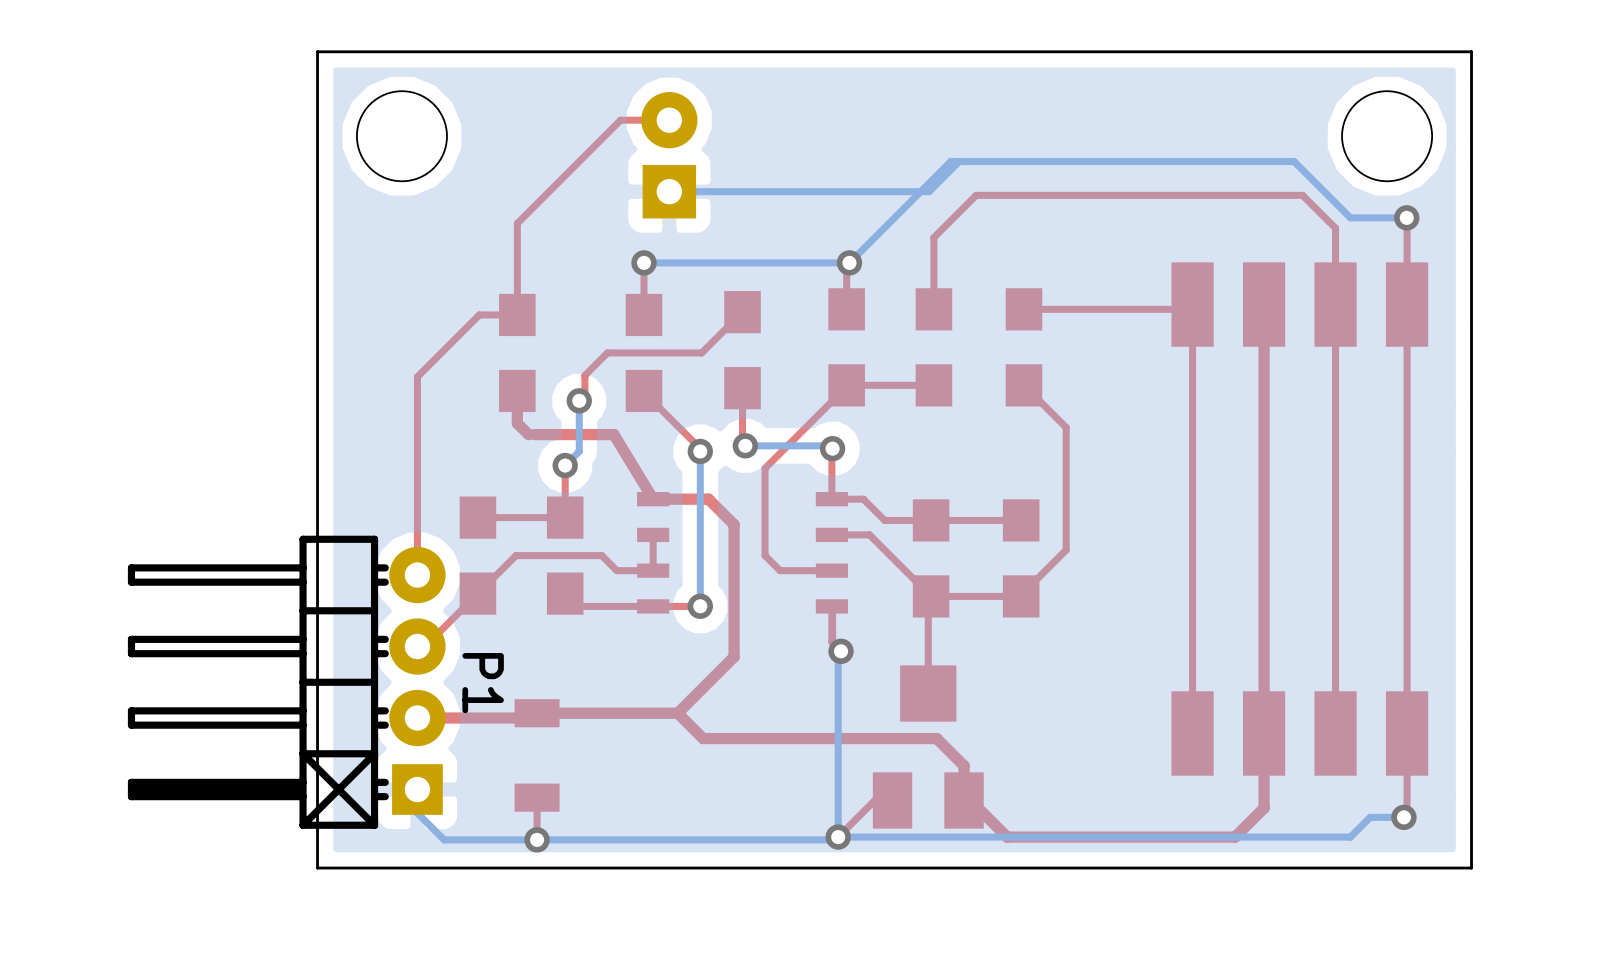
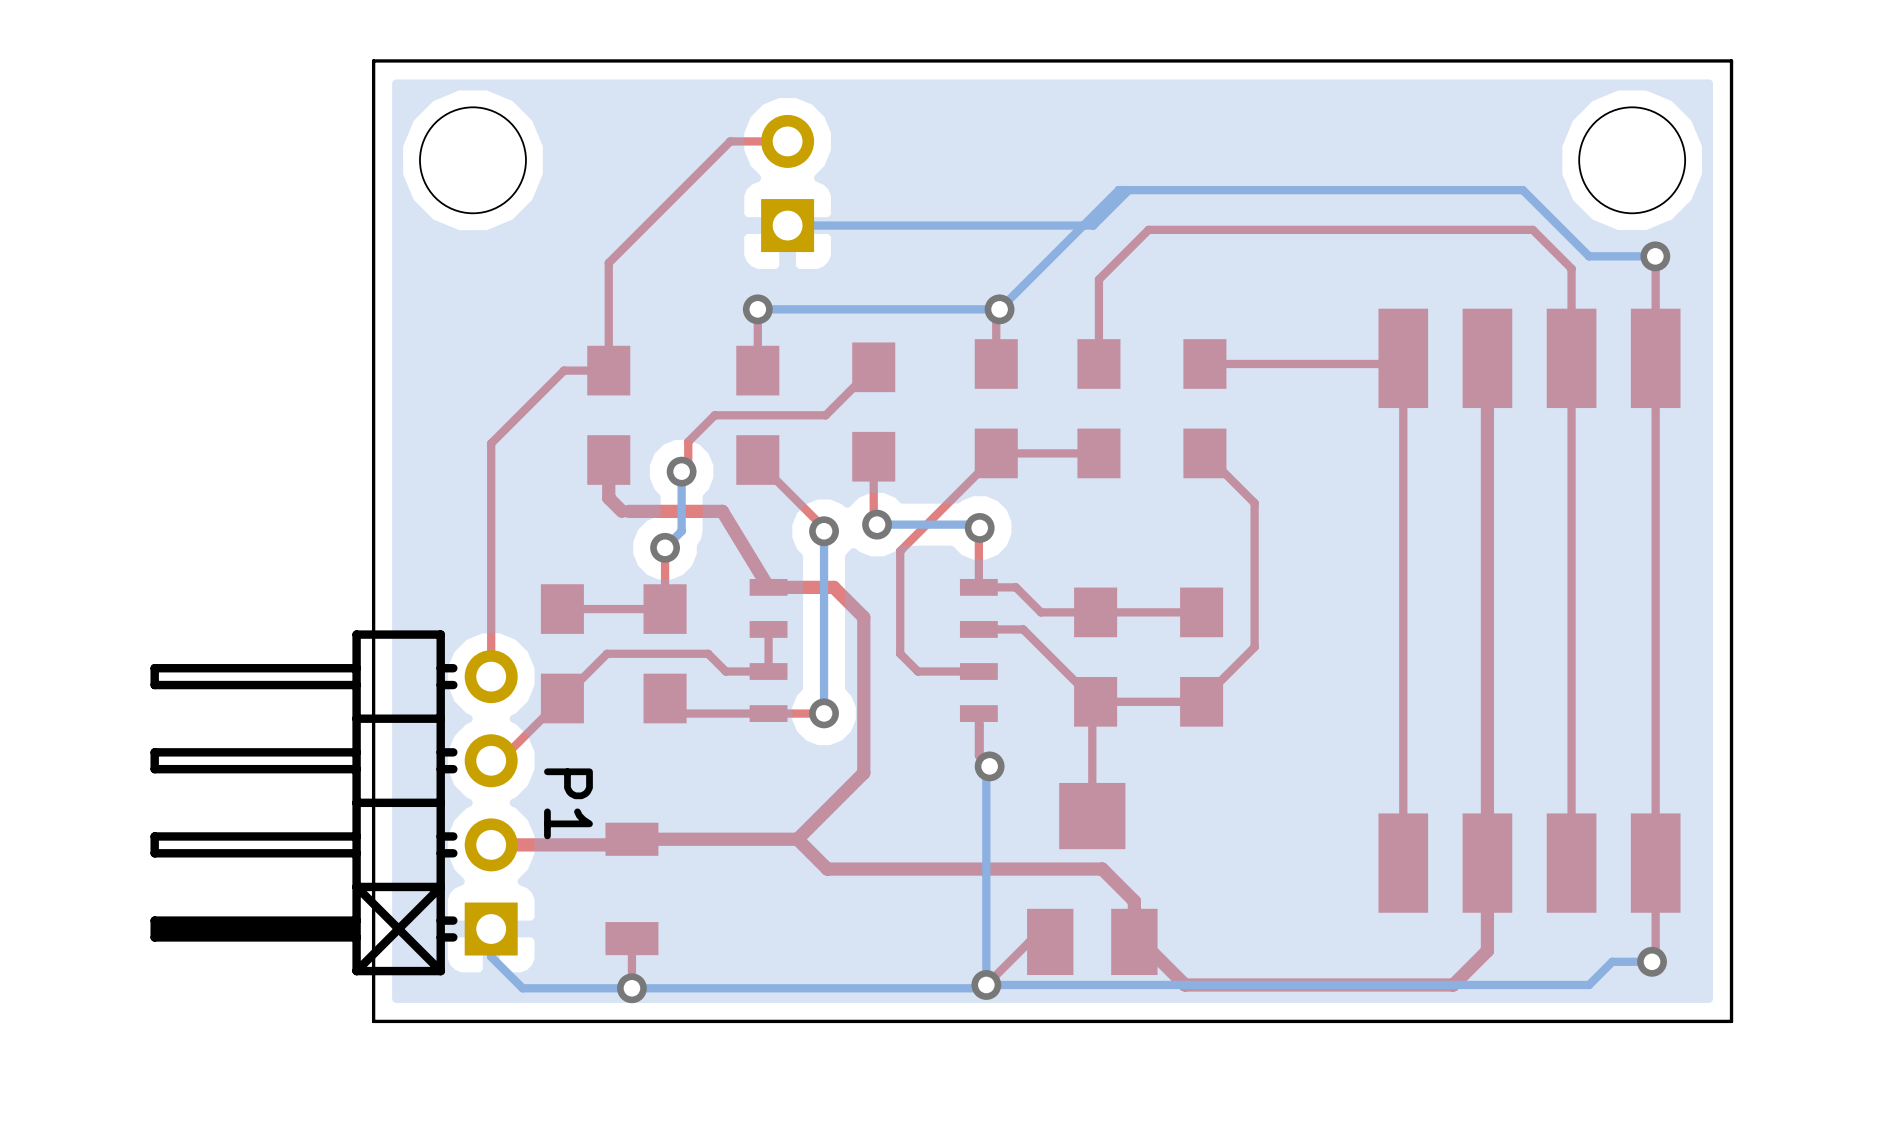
part footprint: [641, 92, 698, 219] -> [761, 114, 815, 253]
P1 footprint: [127, 535, 446, 829] -> [150, 630, 518, 976]

